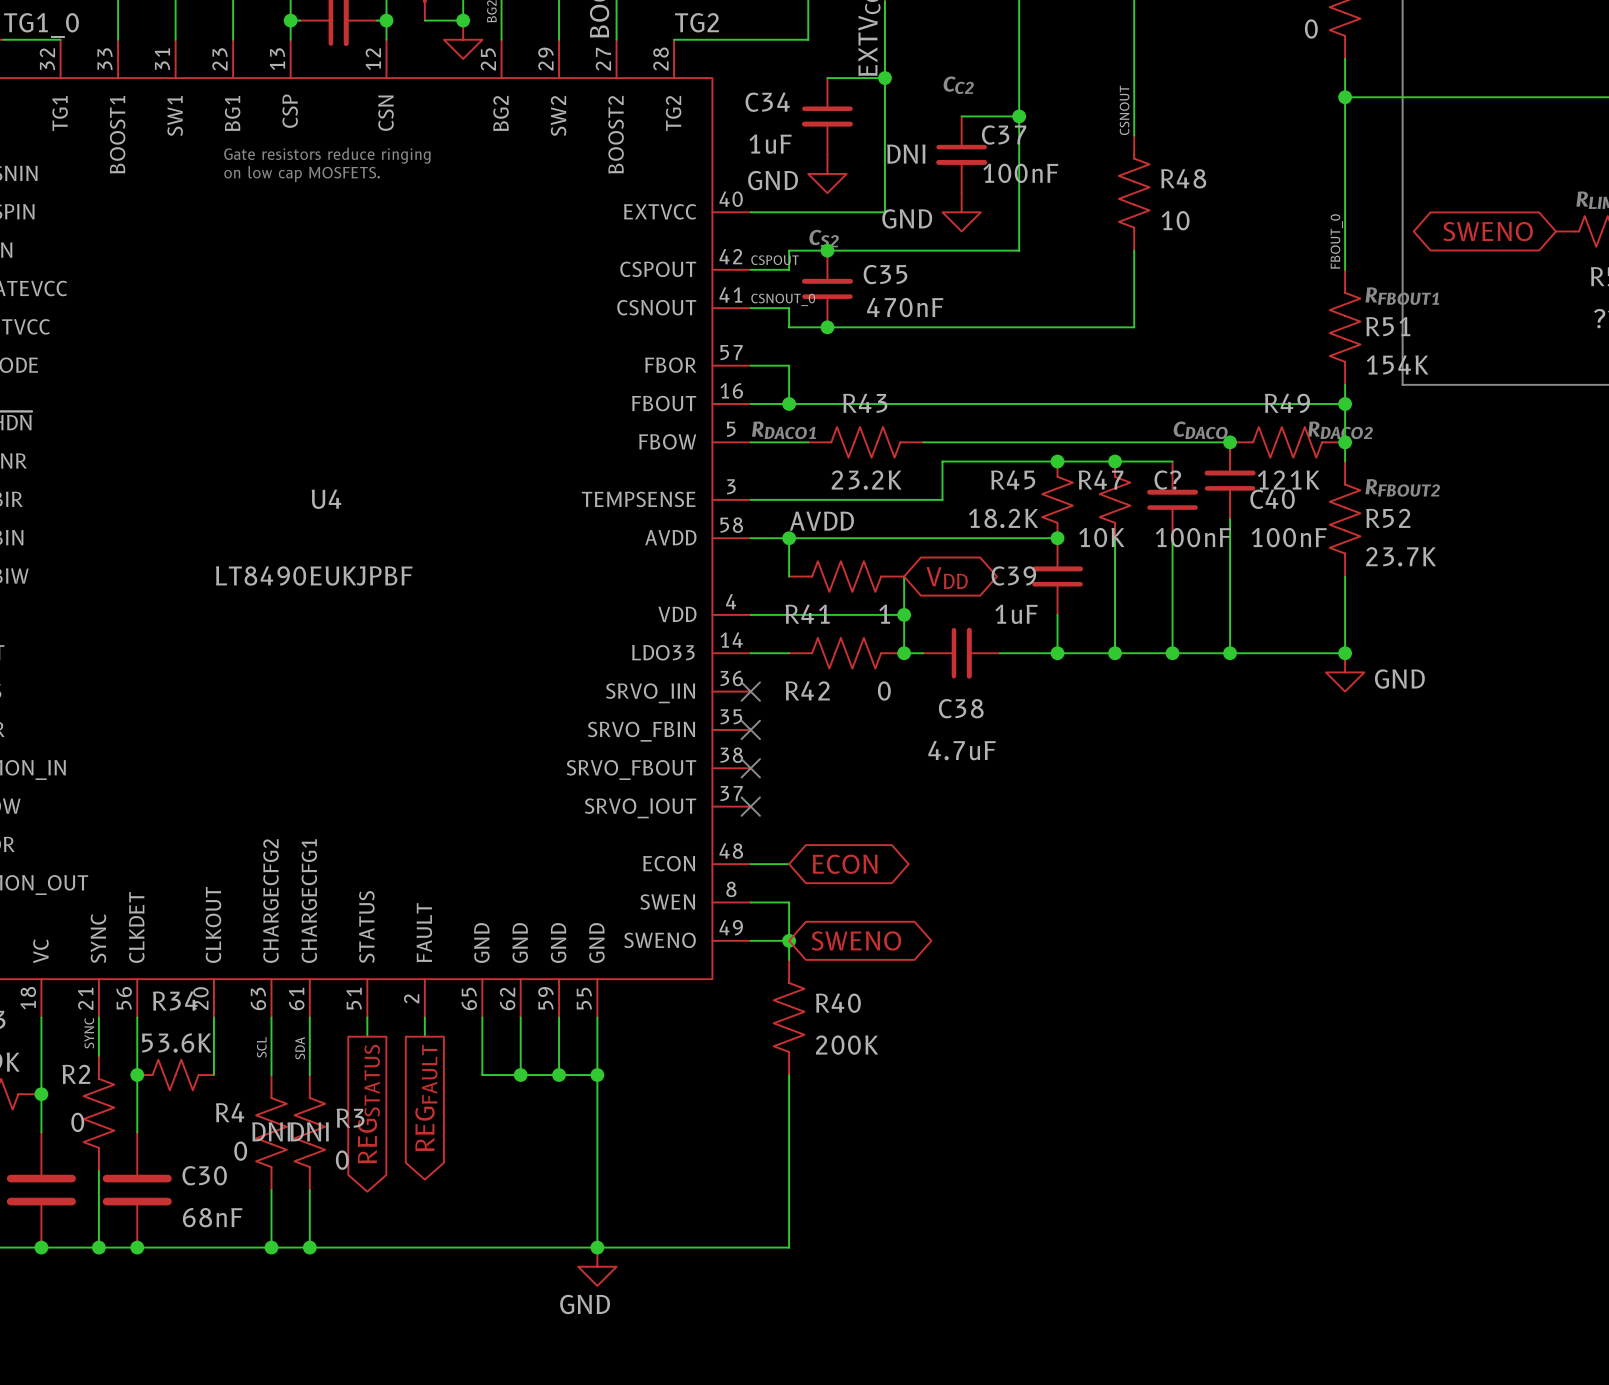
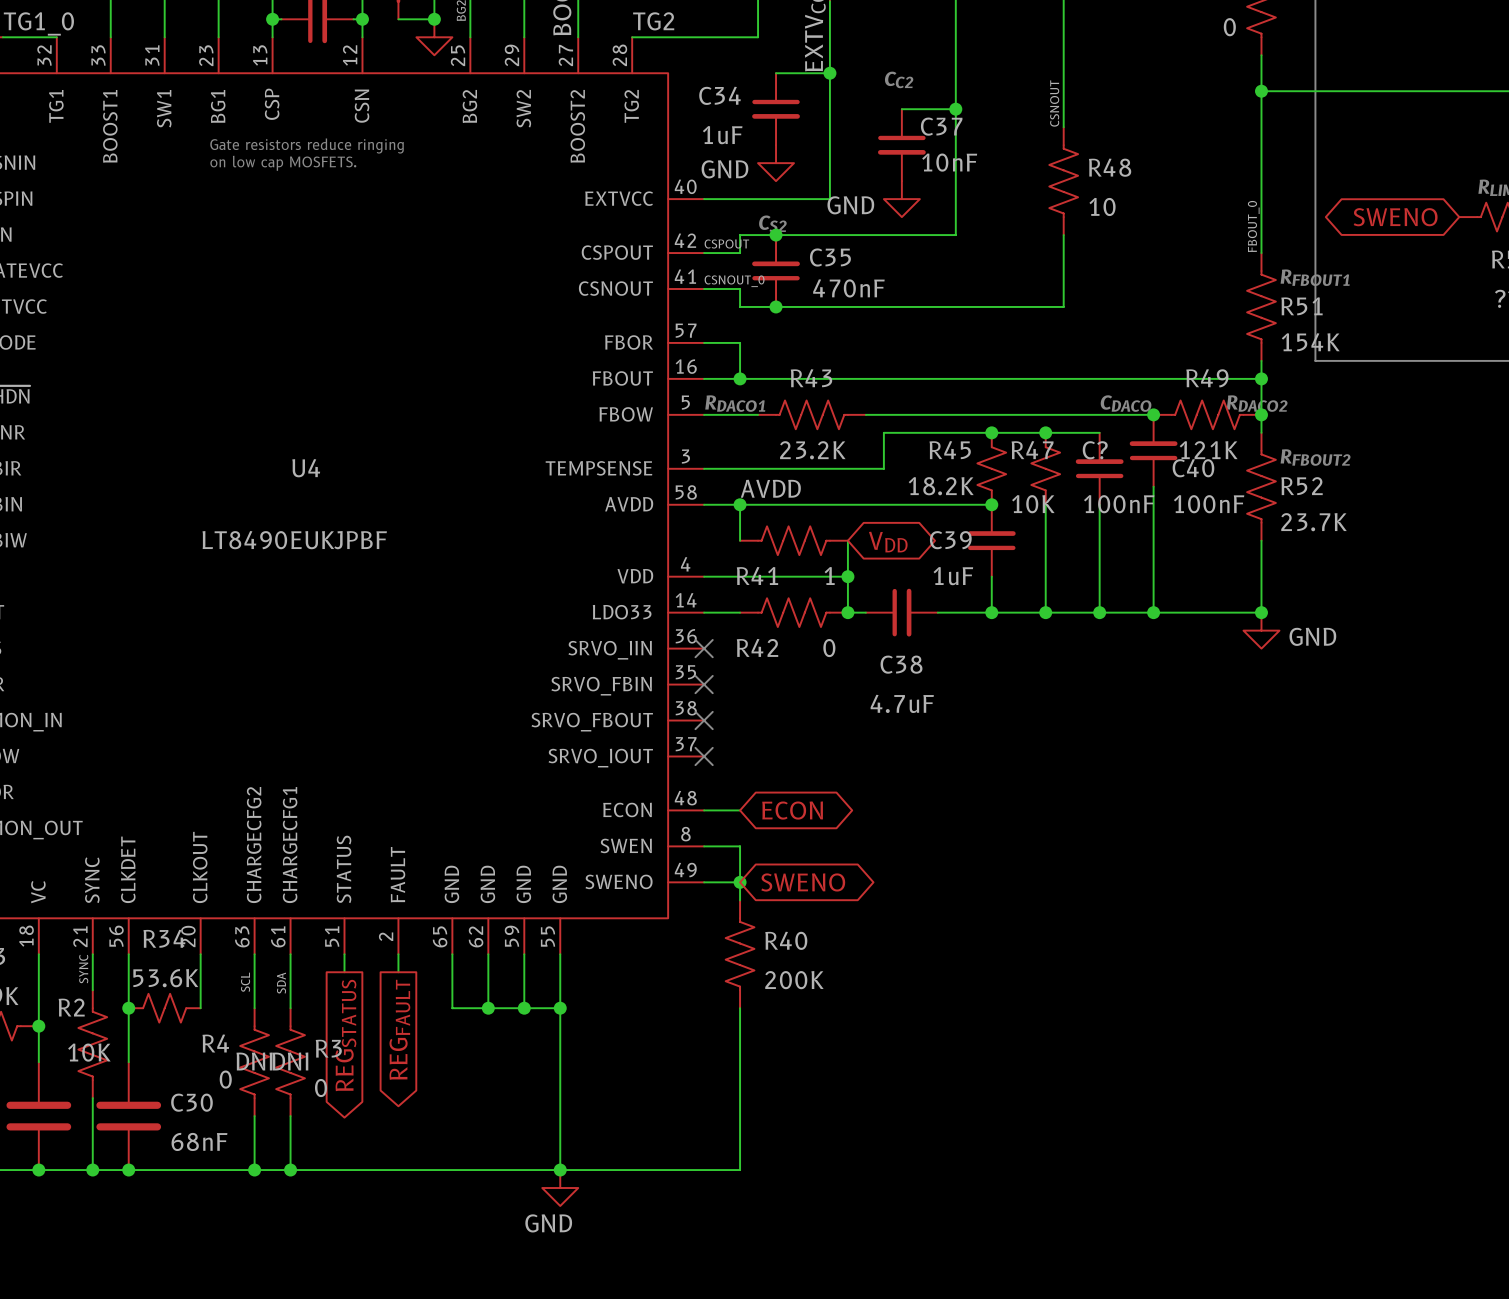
C37 text: DNI (906, 154) -> none
C37 value: 100nF (1020, 173) -> 10nF (949, 162)
R2 value: 0 (77, 1122) -> 10K (89, 1052)

